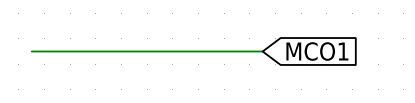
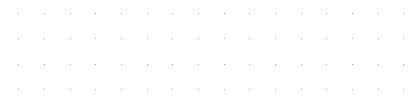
wire: (31, 51) (262, 51) -> none
global label: MCO1 (317, 51) -> none

